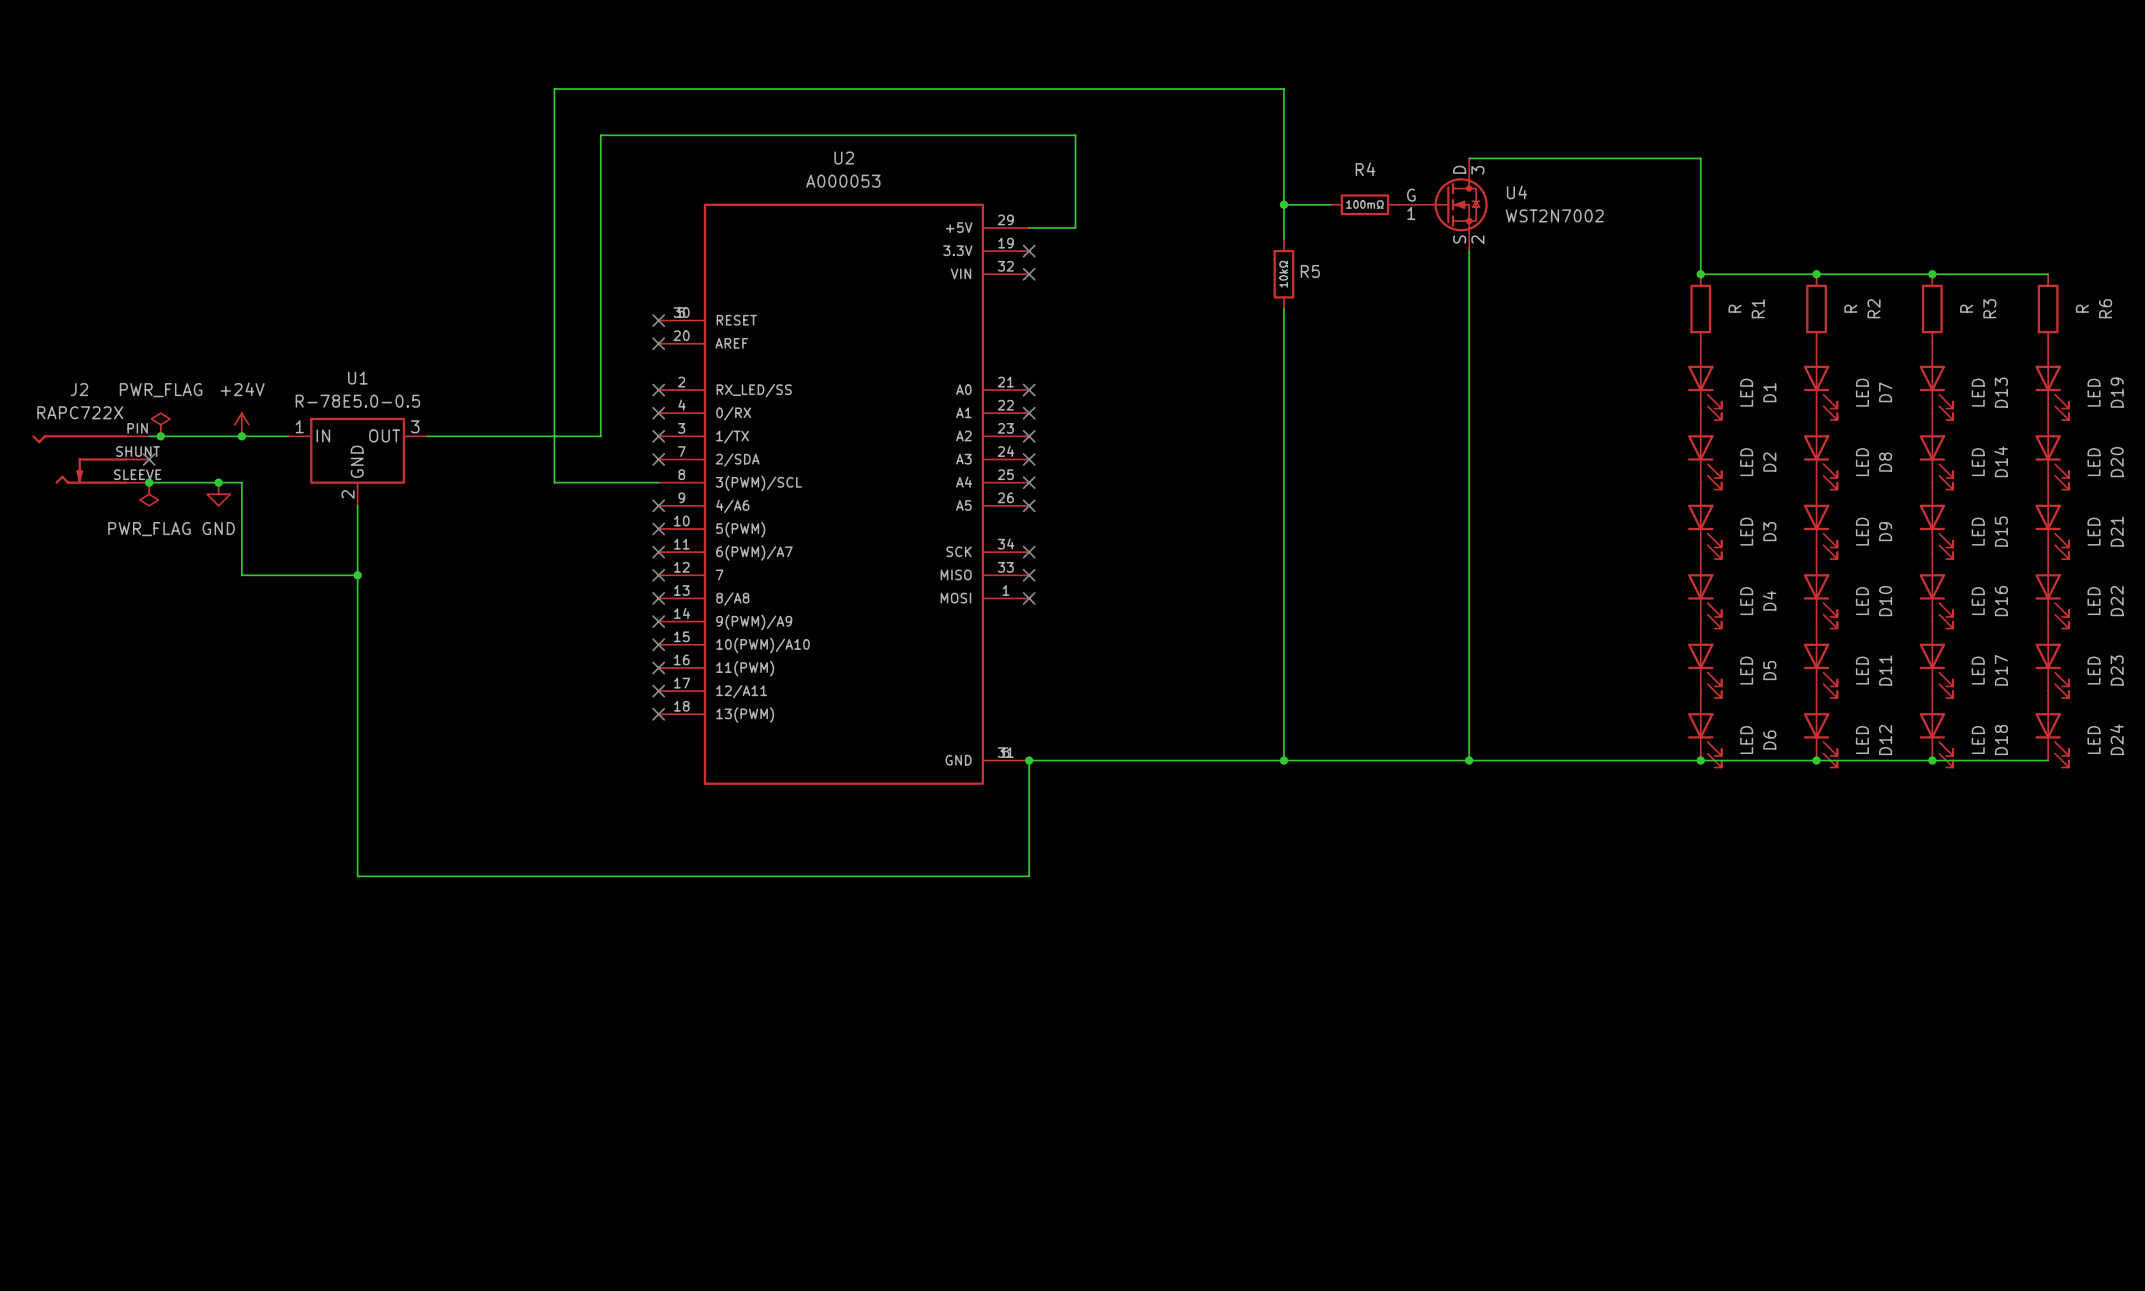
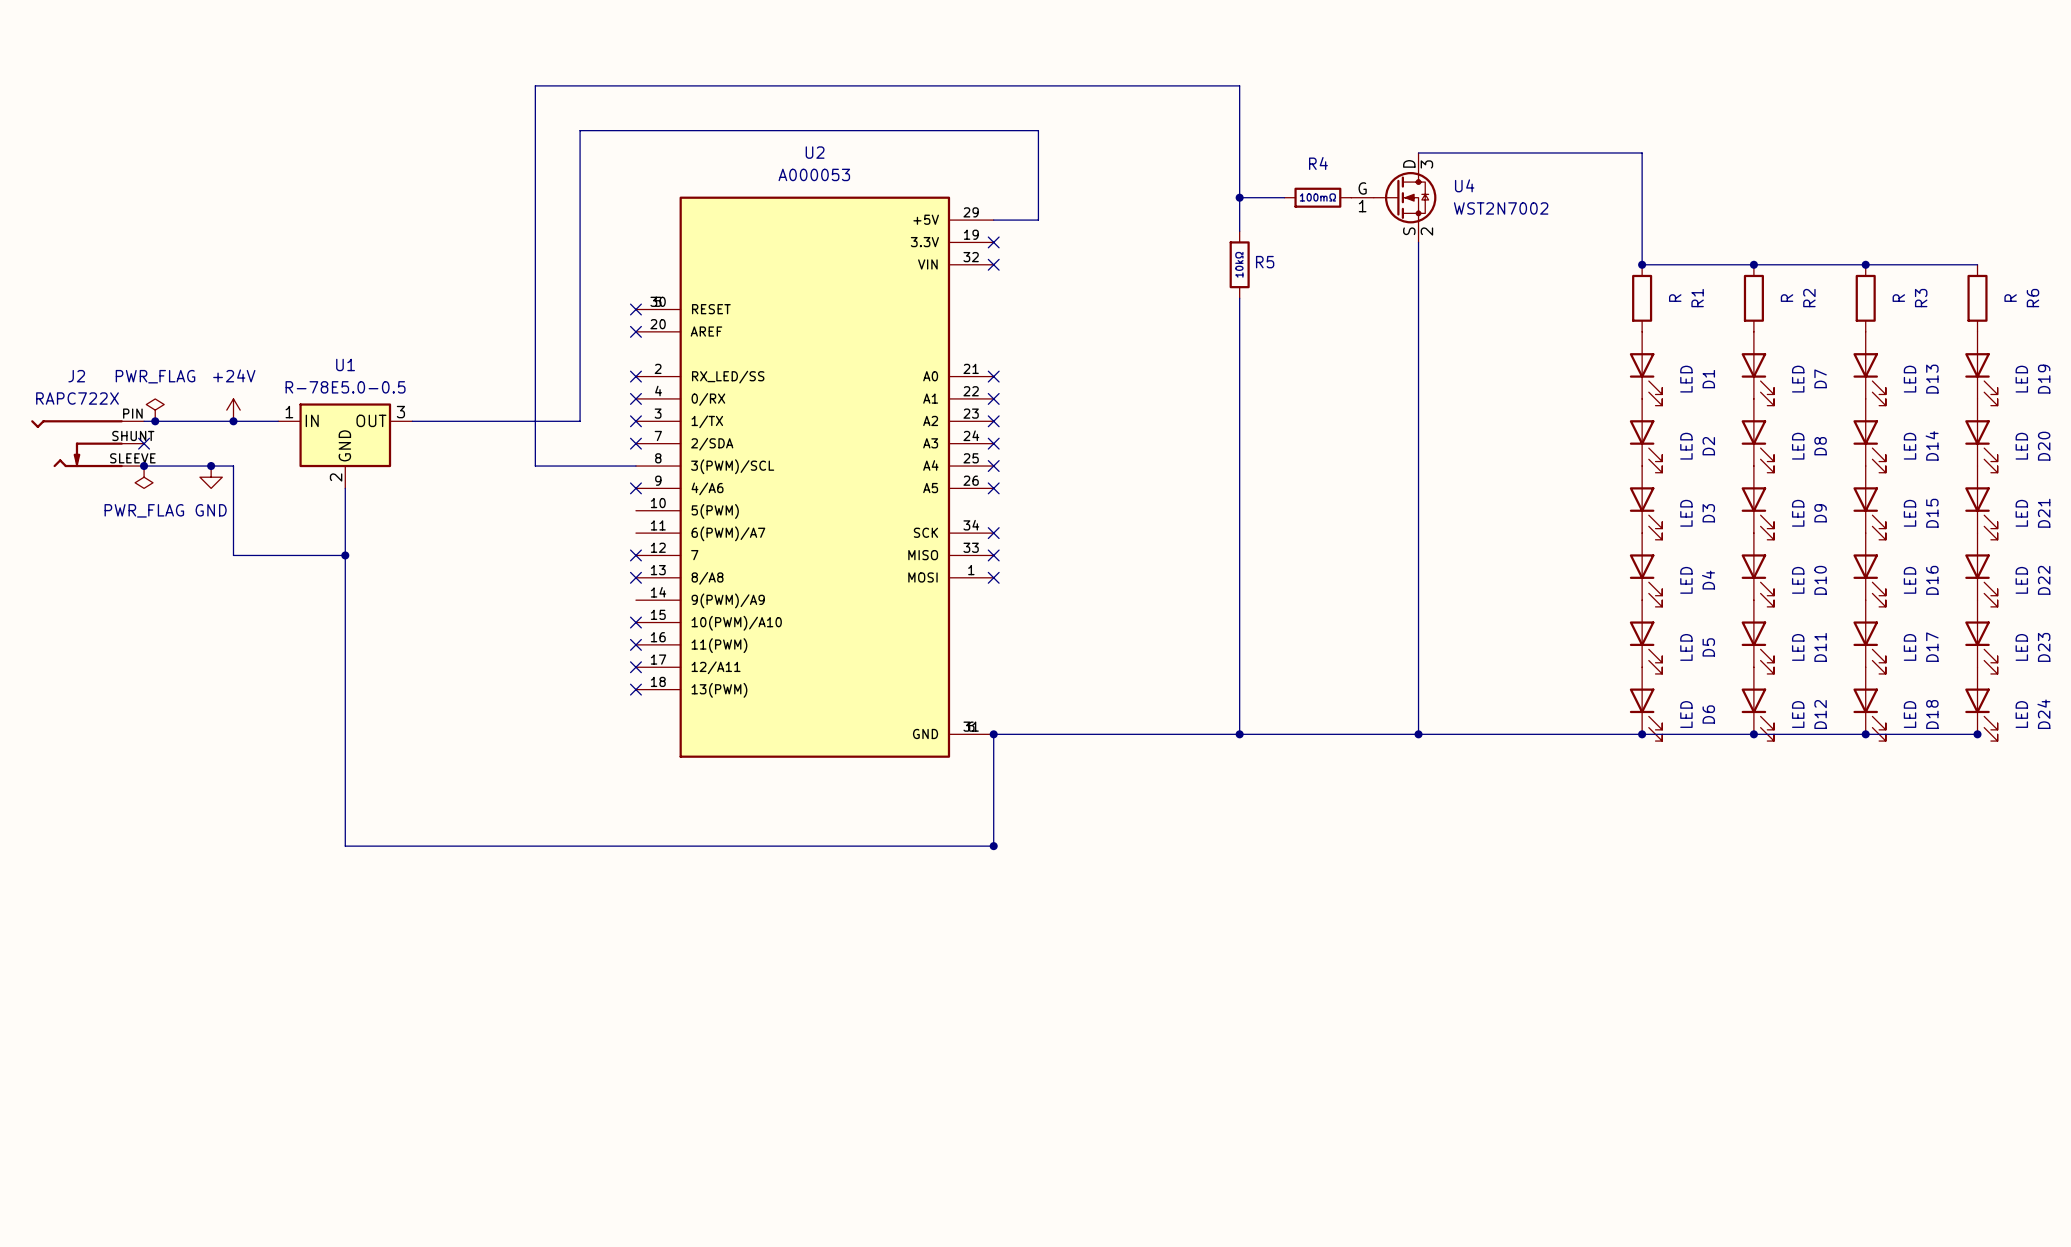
no-connect mark: (658, 528) -> none
no-connect mark: (658, 552) -> none
no-connect mark: (658, 621) -> none
junction: none -> (1977, 734)
junction: none -> (993, 846)

